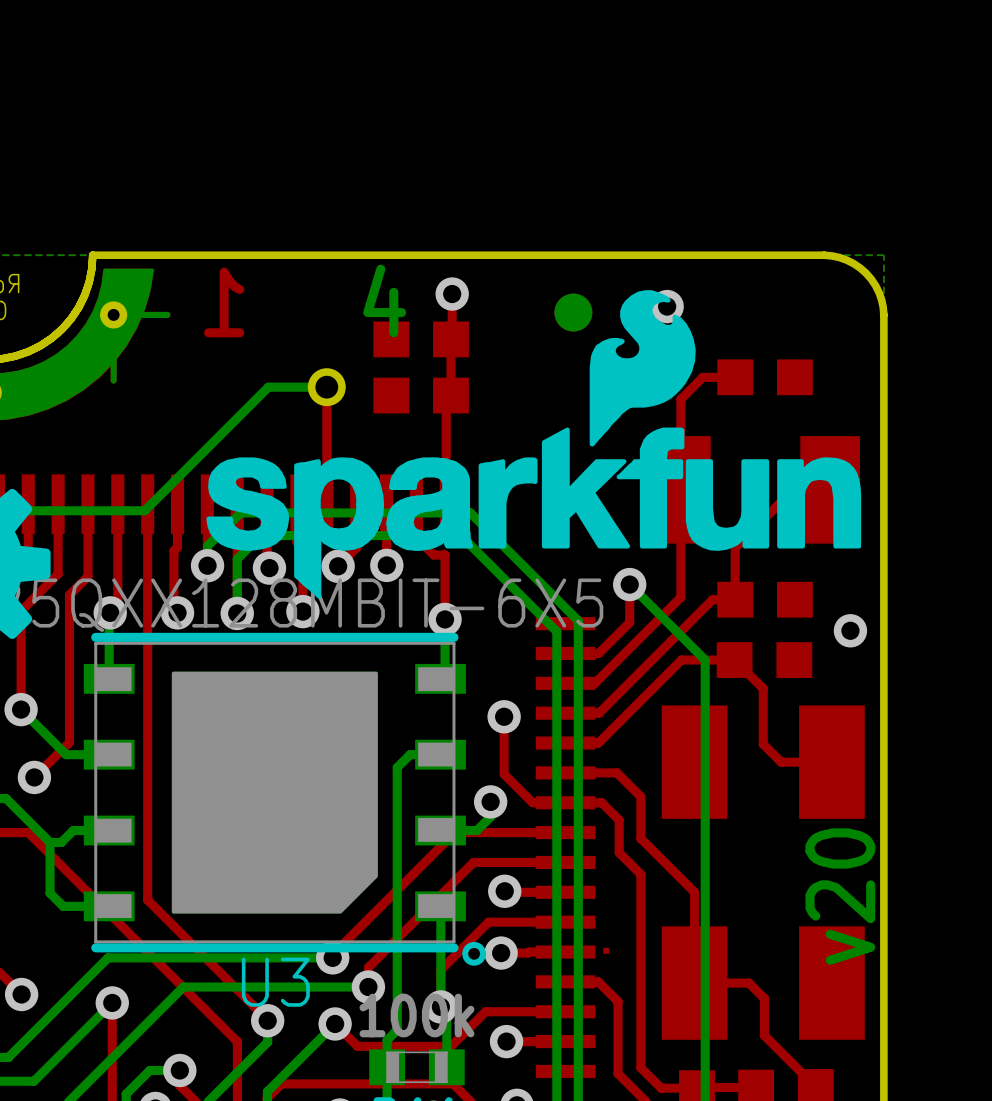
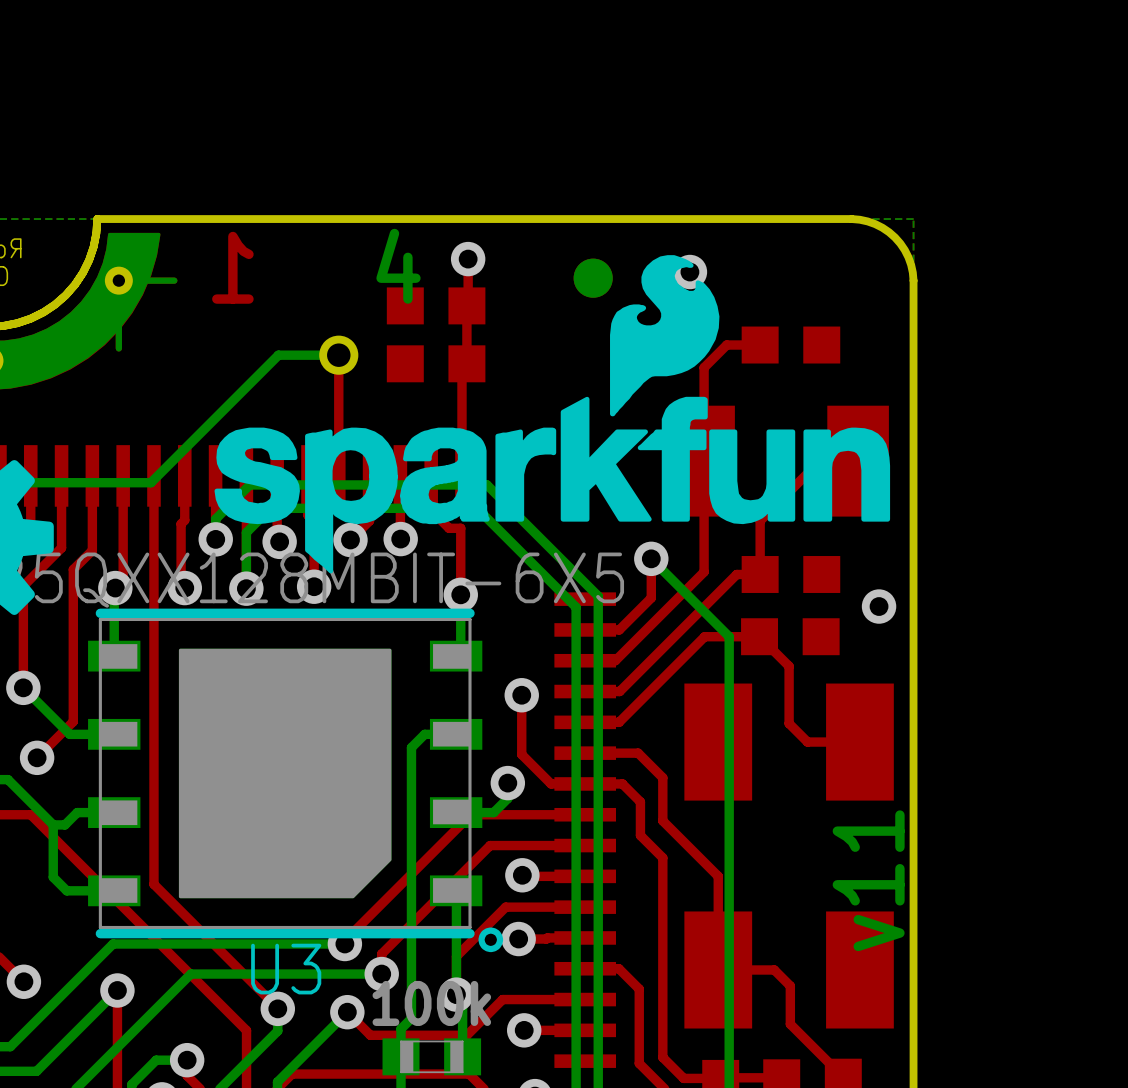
text: v20 (840, 896) -> v11 (868, 880)
drawing: [603, 947, 610, 954] -> none

